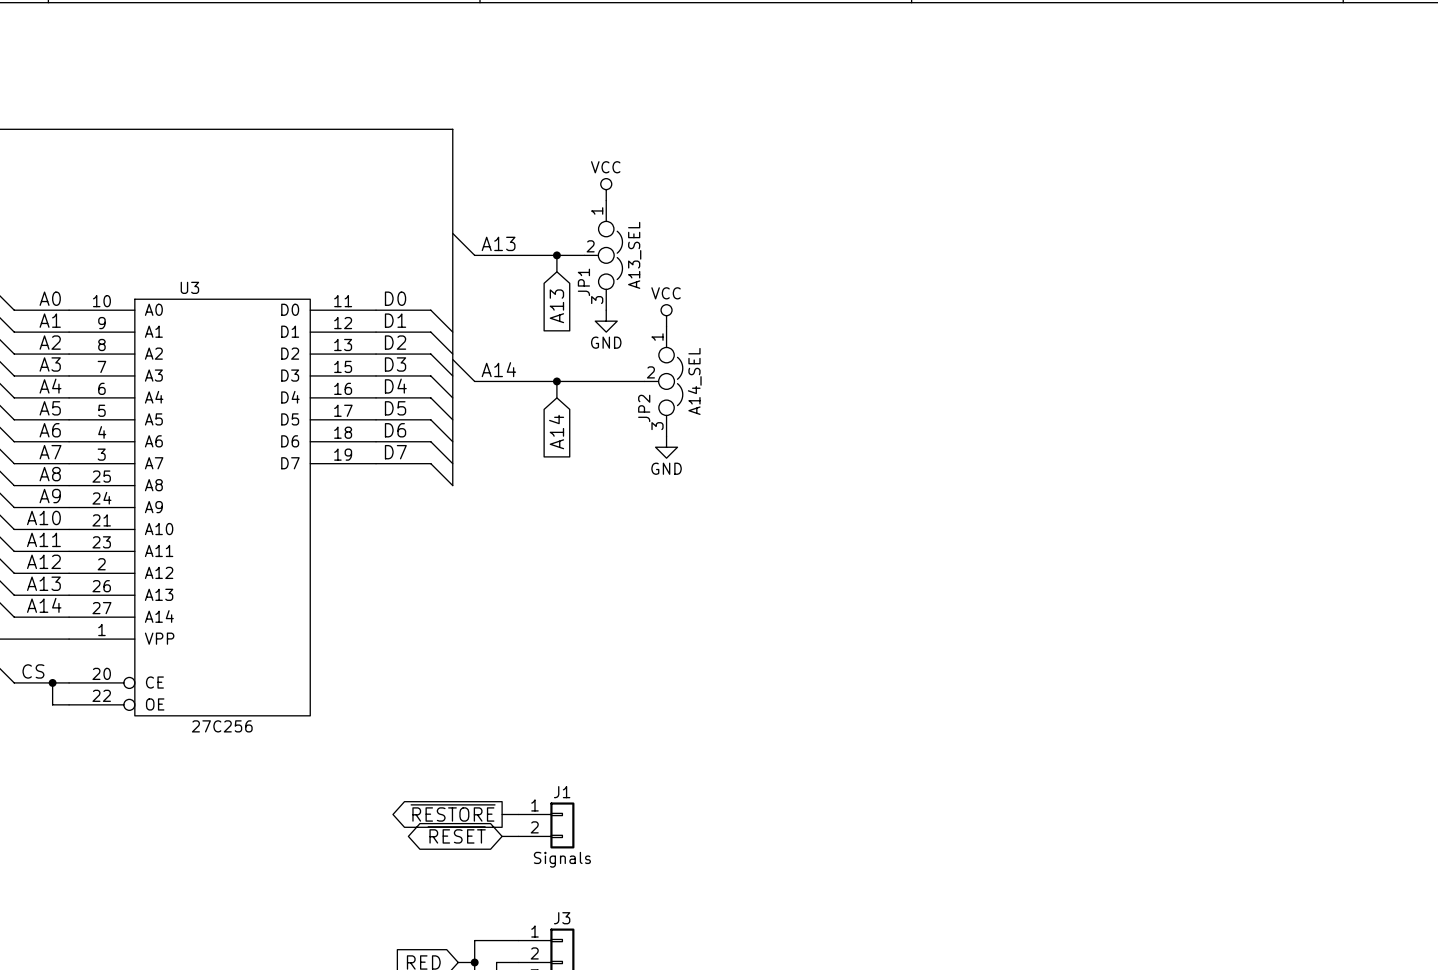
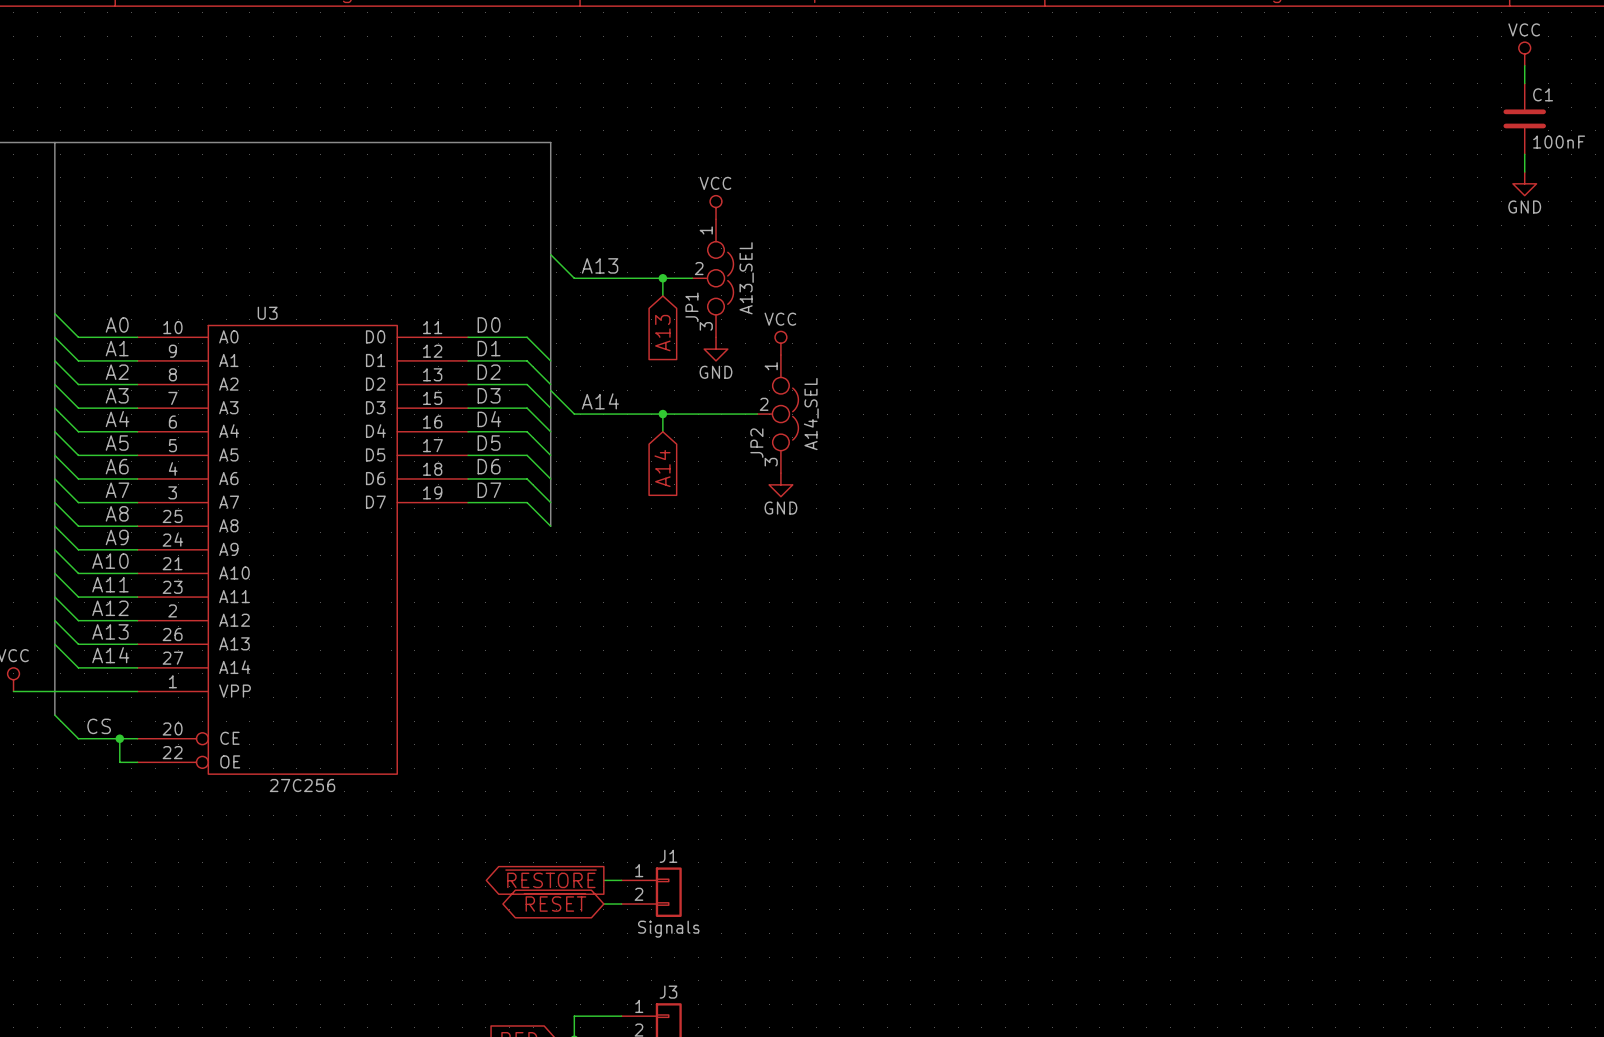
power symbol: none -> VCC (1524, 53)
wire: none -> (1524, 65) (1524, 83)
C1: none -> 100nF (1524, 118)
wire: none -> (1524, 154) (1524, 172)
power symbol: none -> GND (1524, 183)

